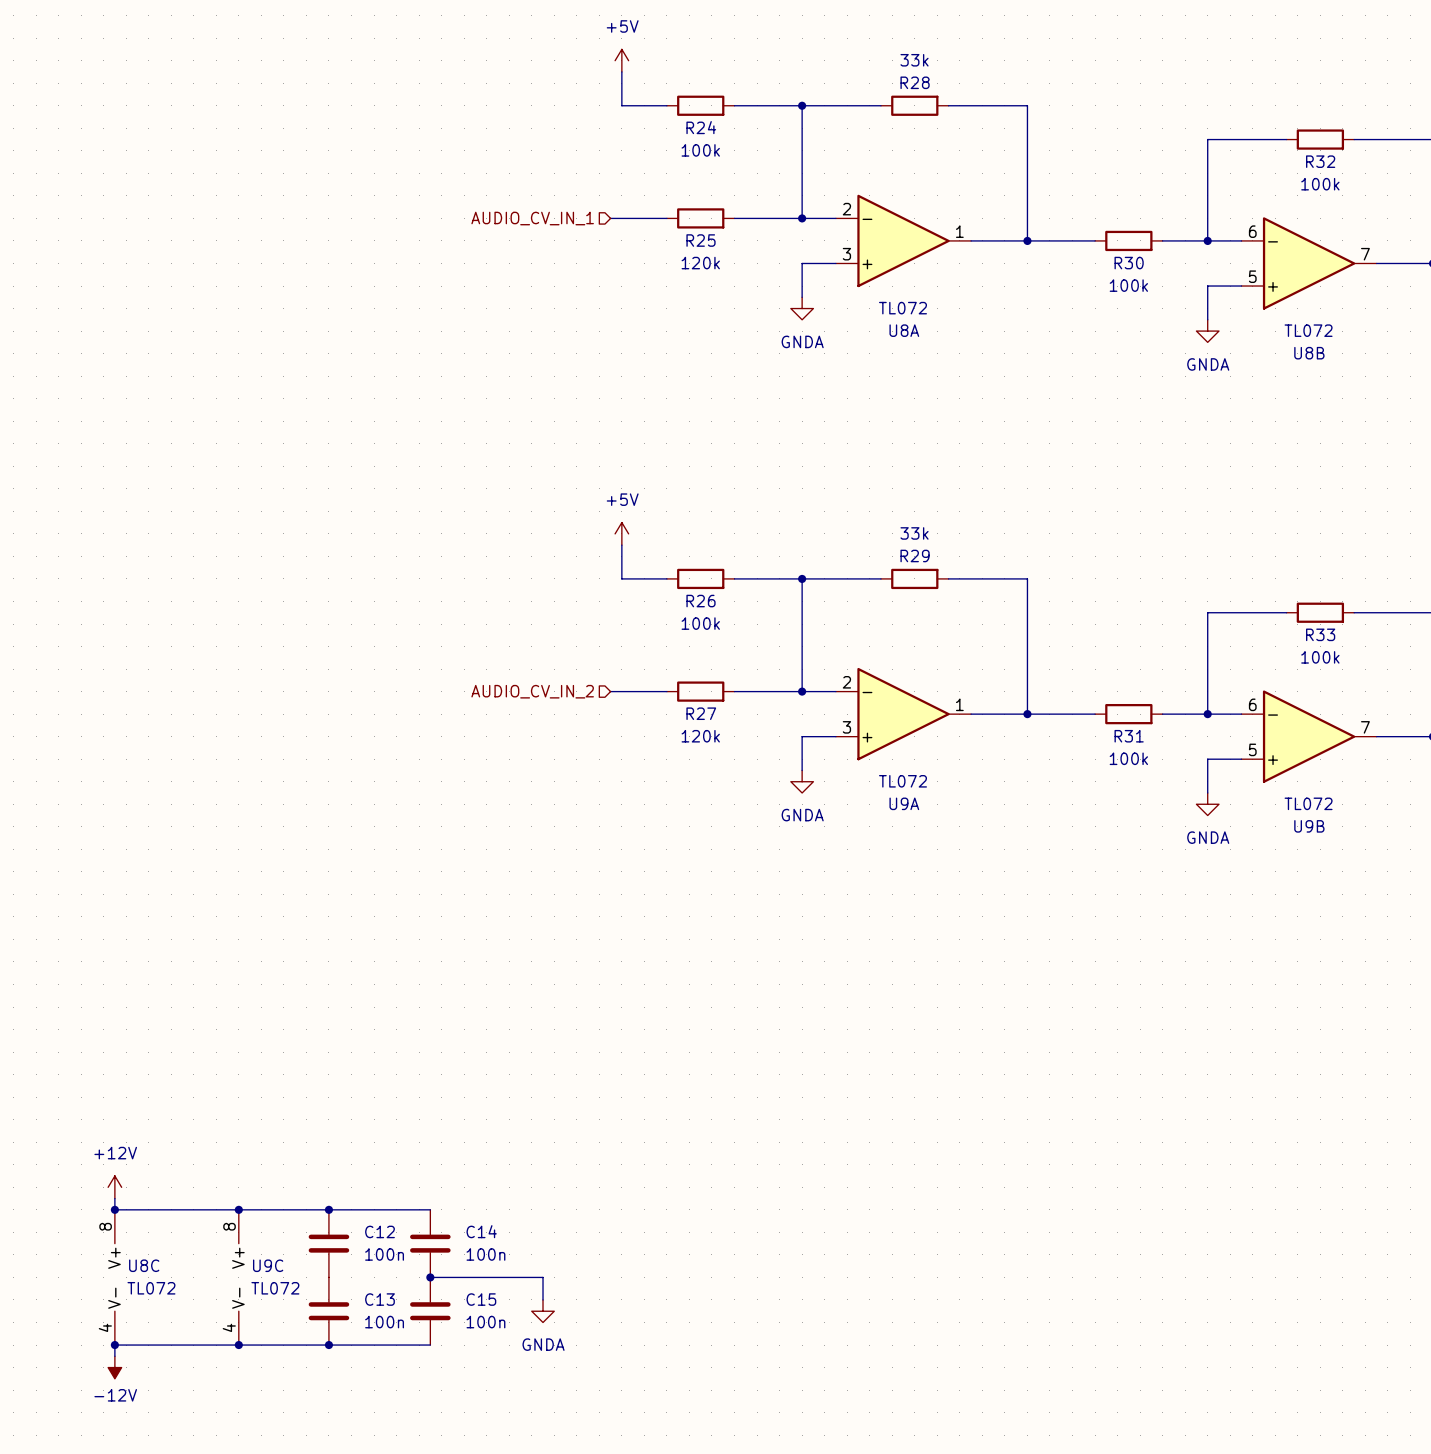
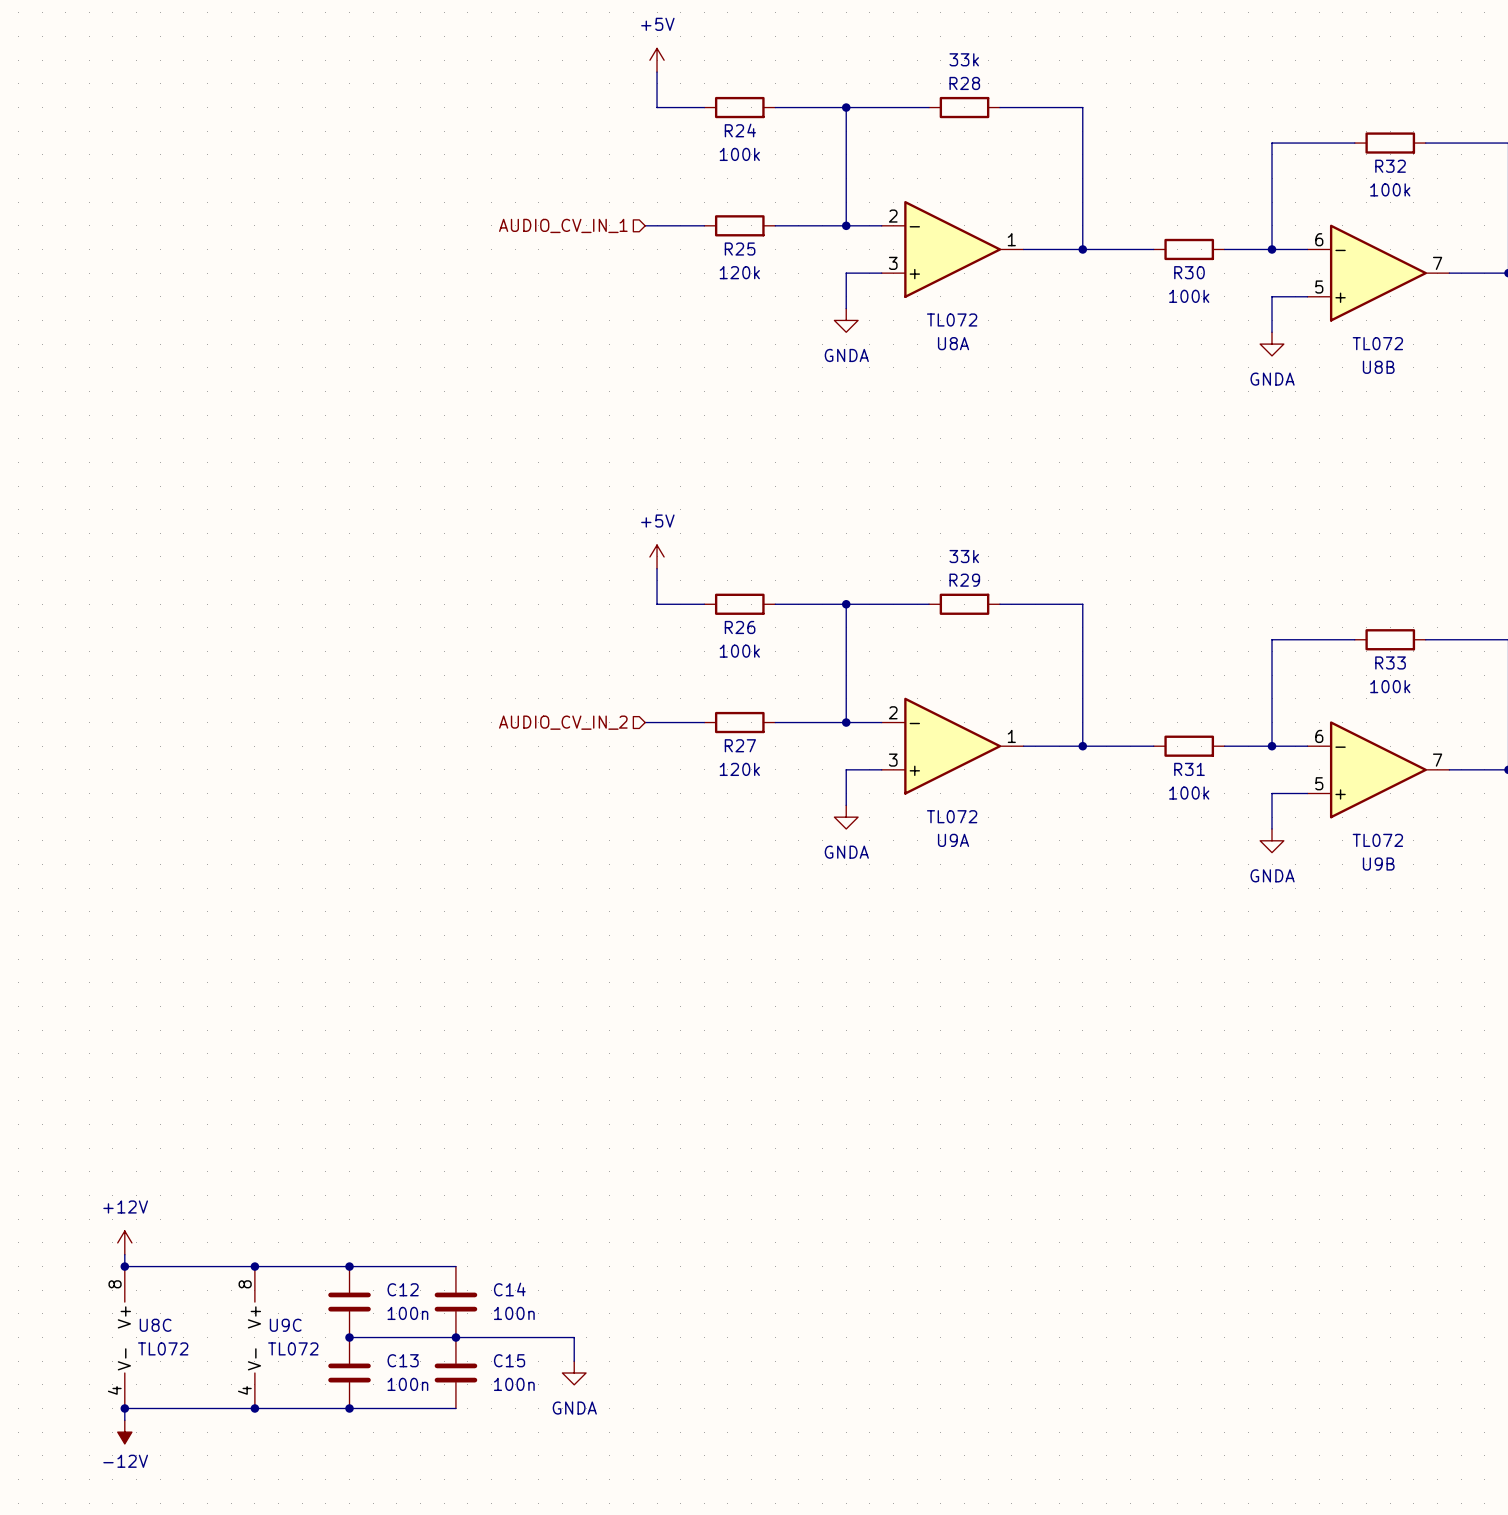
wire: none -> (349, 1337) (455, 1337)
junction: none -> (349, 1337)

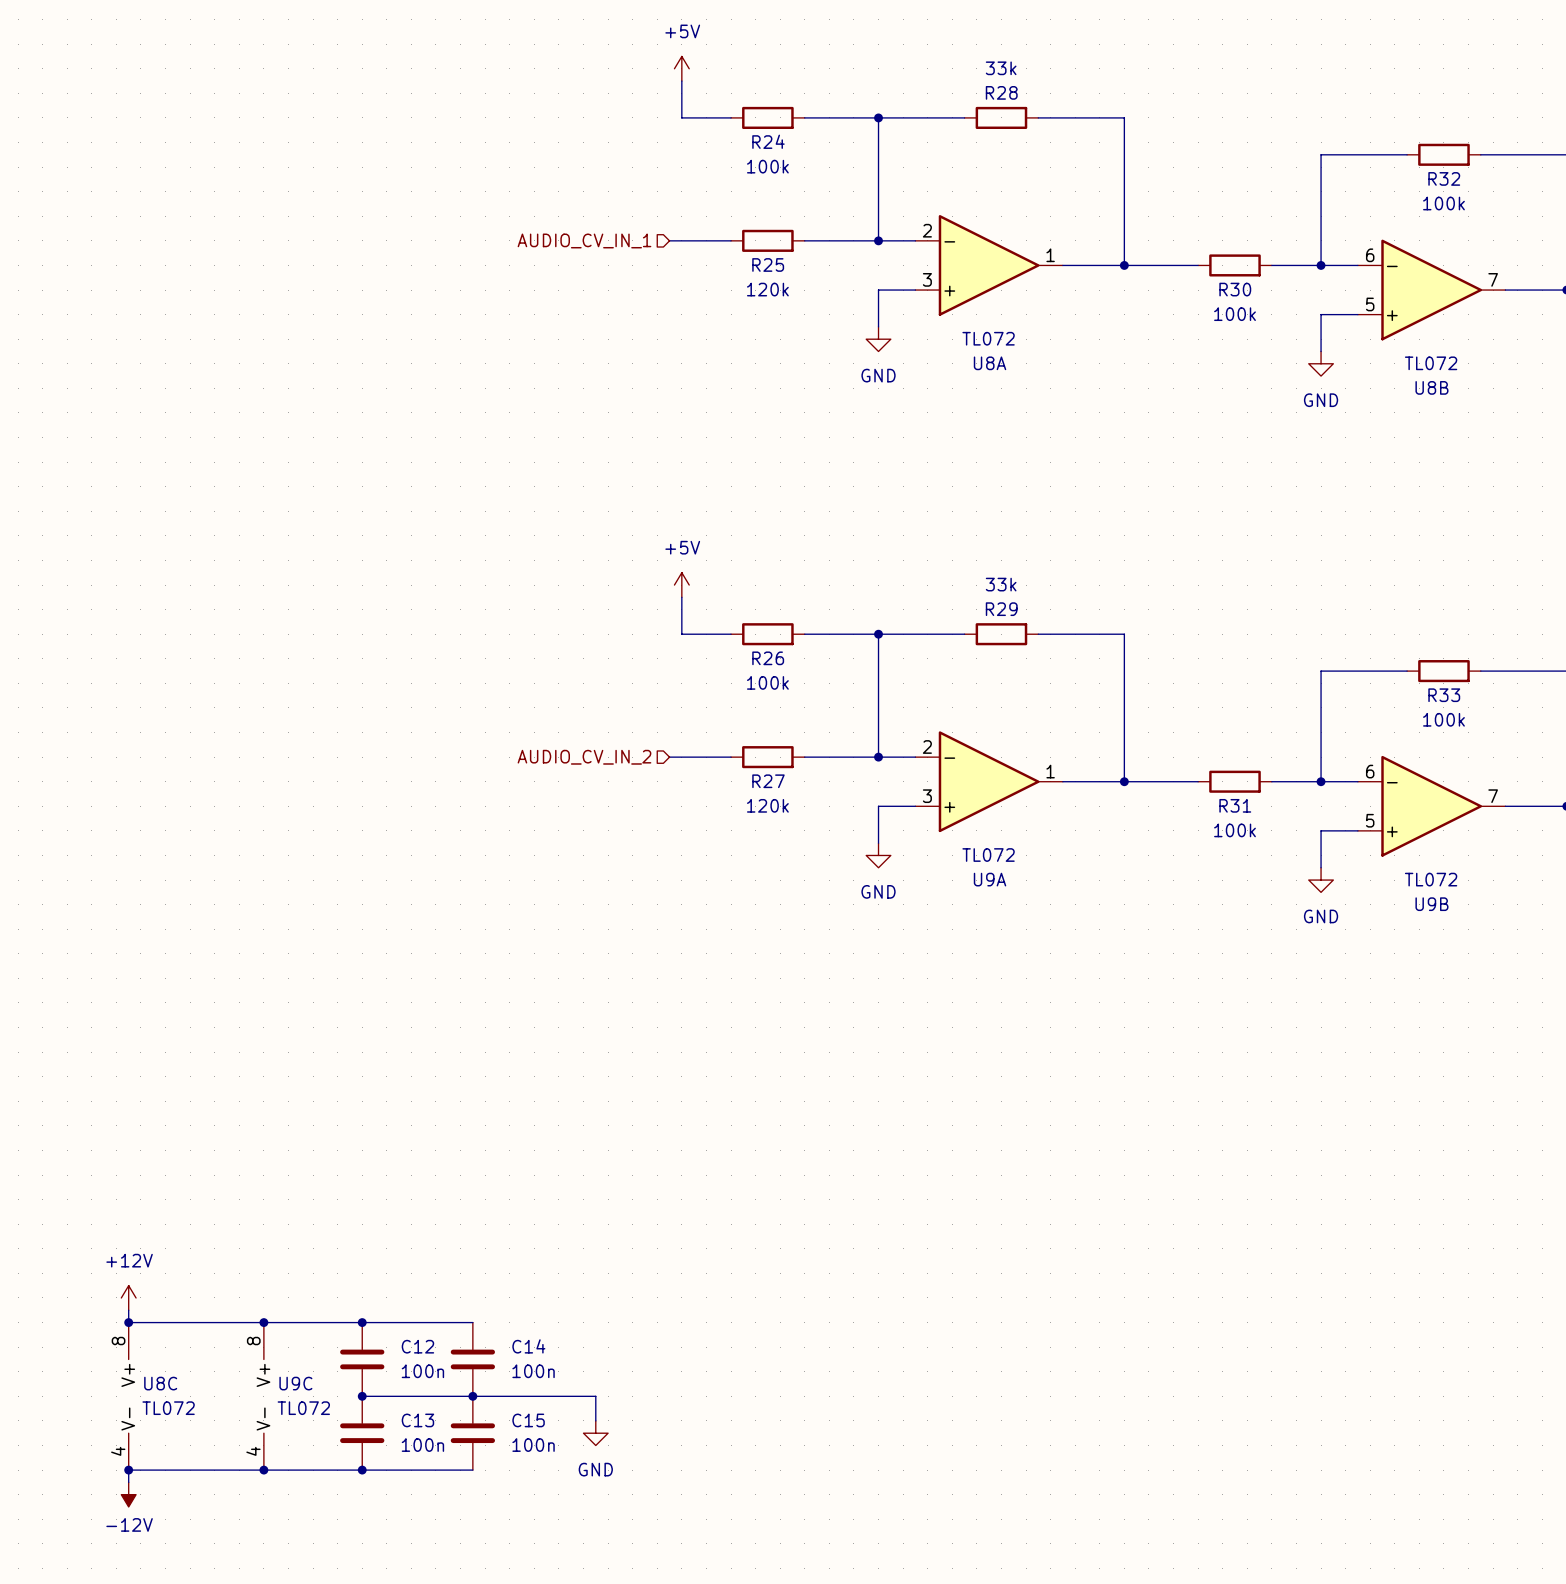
power symbol: GNDA (846, 320) -> GND (878, 339)
power symbol: GNDA (1272, 344) -> GND (1321, 363)
power symbol: GNDA (846, 817) -> GND (878, 855)
power symbol: GNDA (1272, 840) -> GND (1321, 880)
power symbol: GNDA (574, 1373) -> GND (595, 1433)

